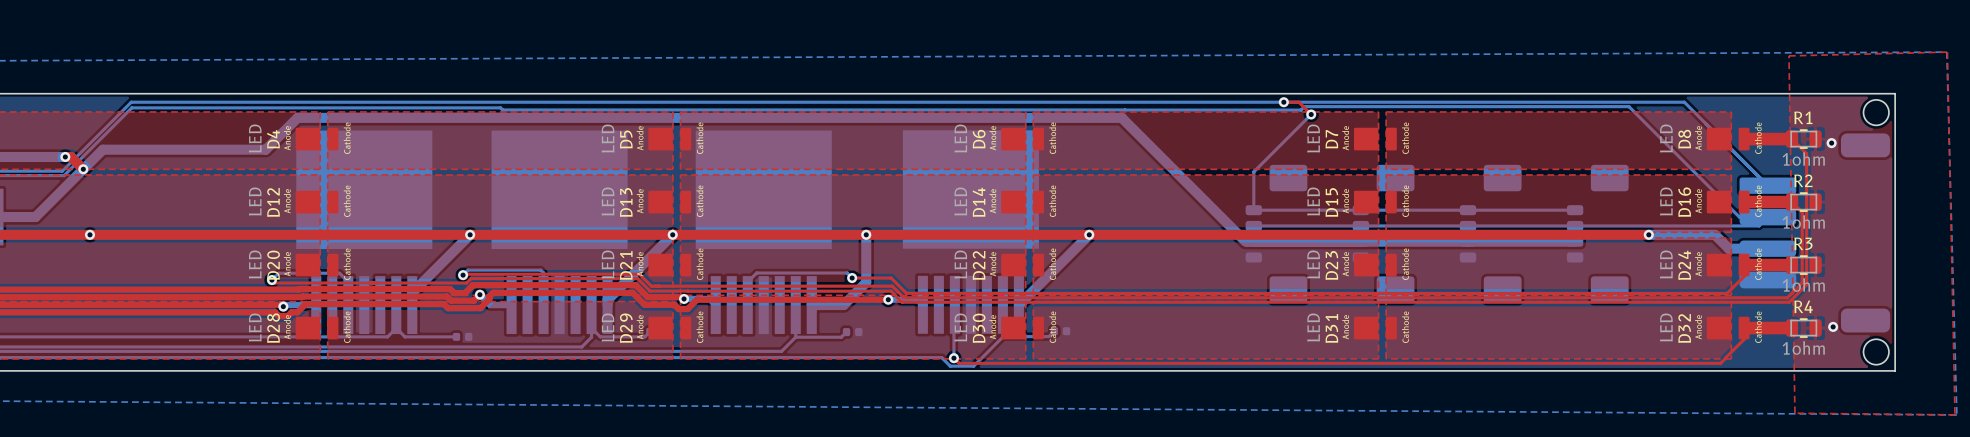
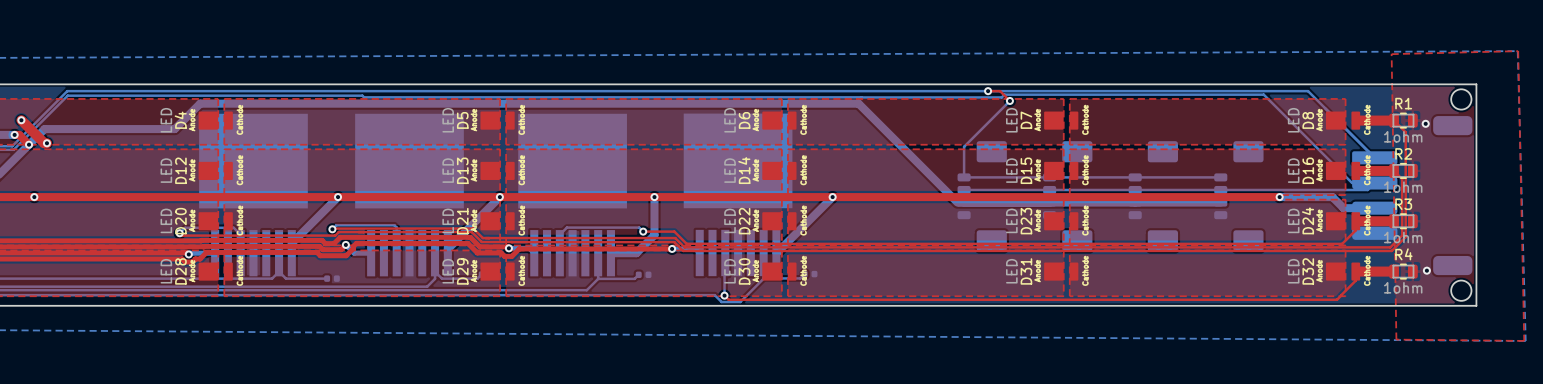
top track: none -> (21, 120) (44, 143) (46, 143)
via: none -> (21, 120)
via: none -> (46, 143)

